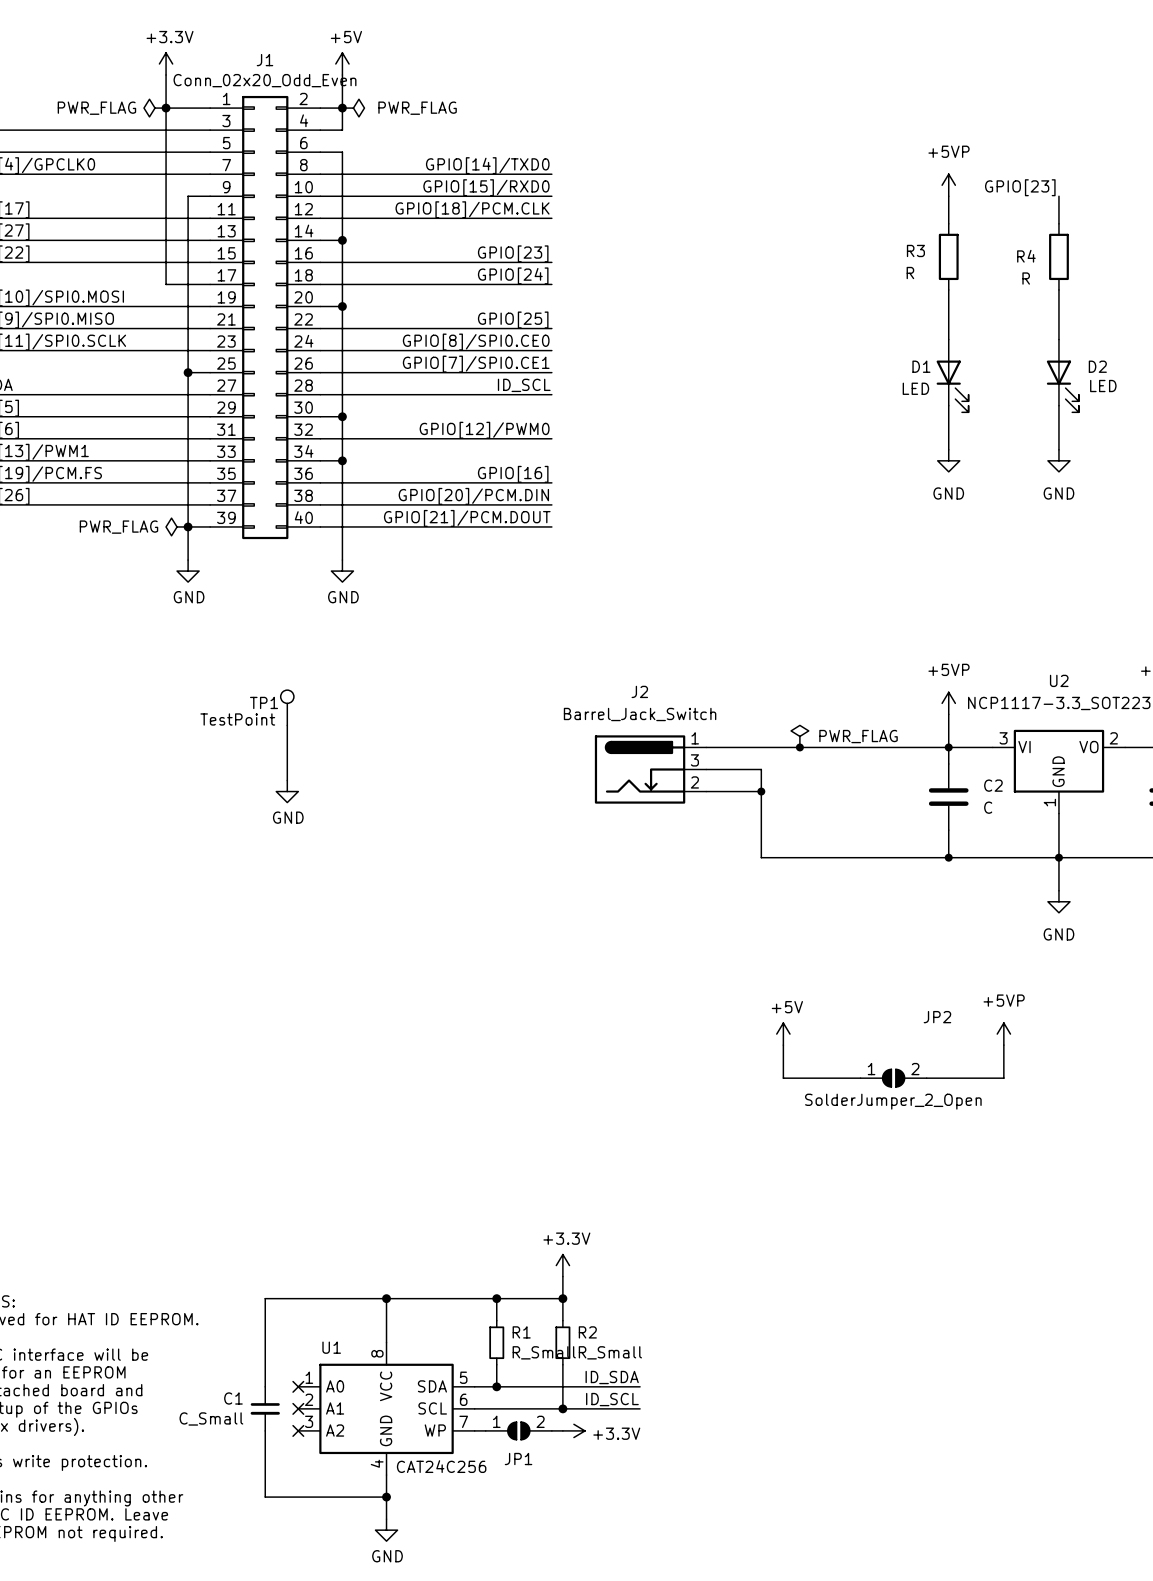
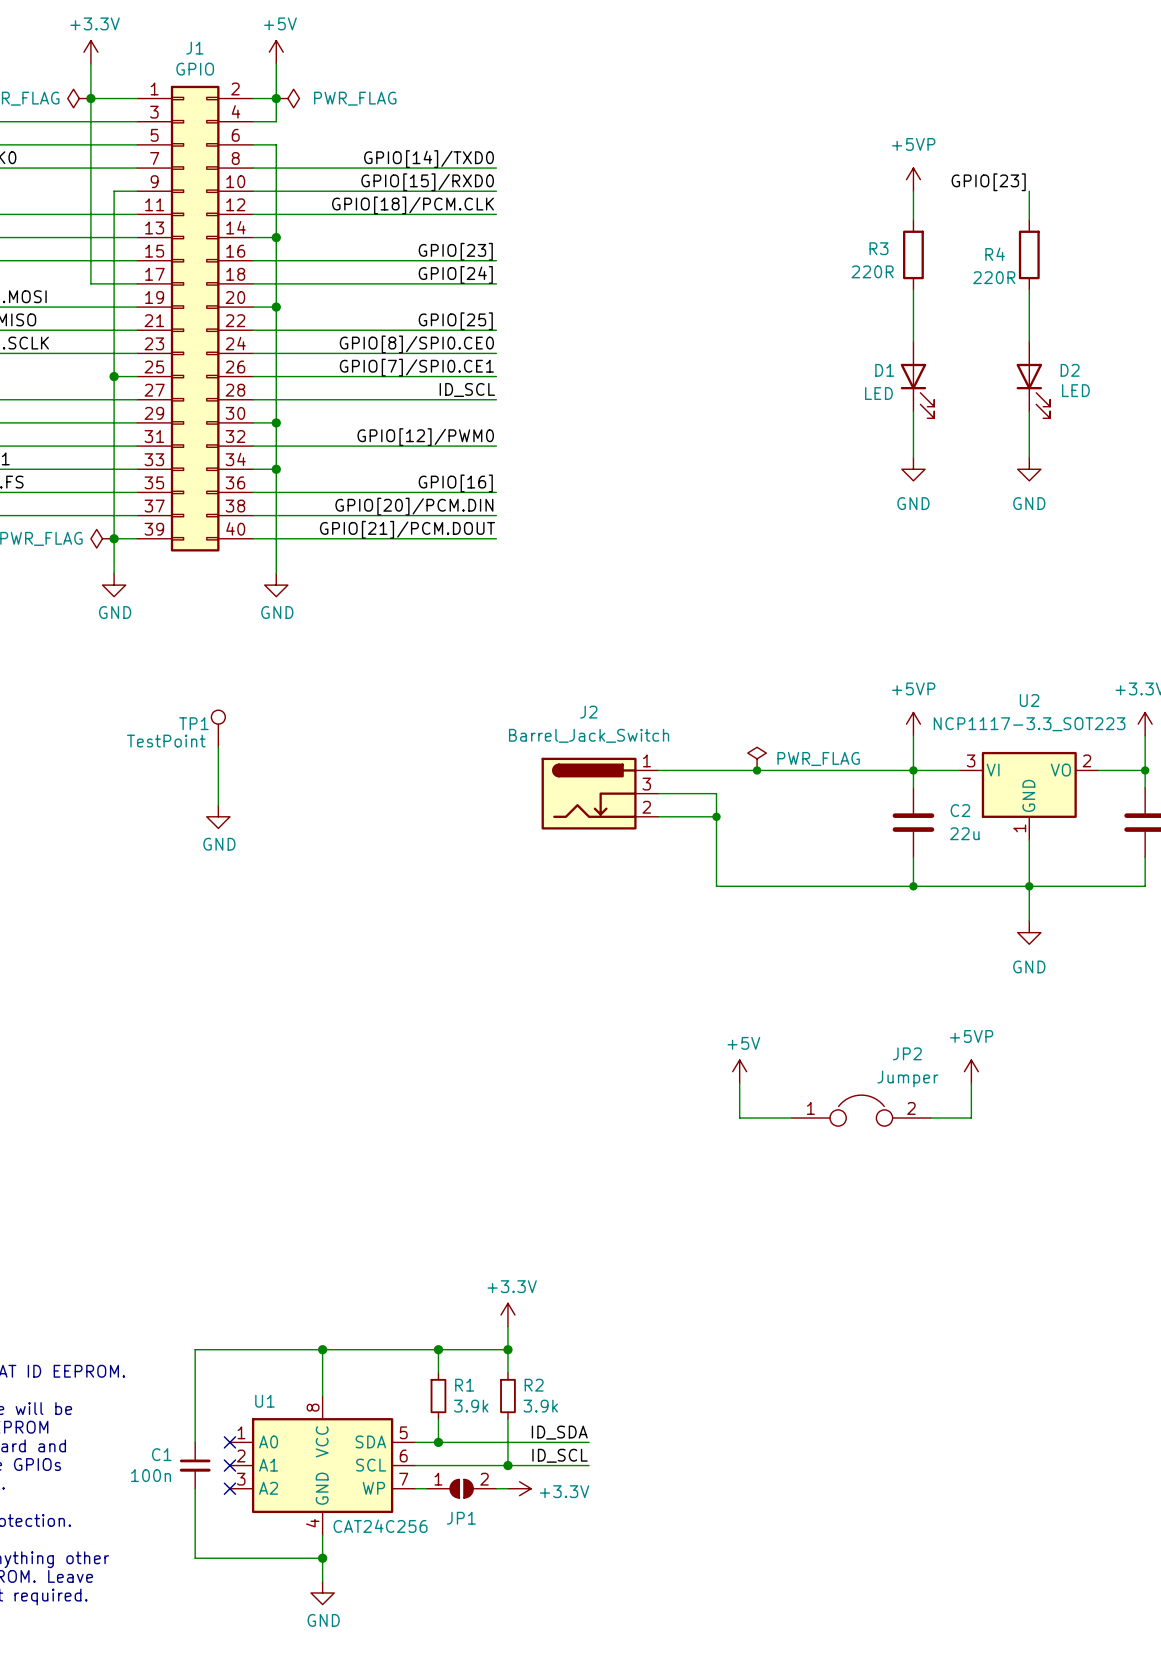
J1 value: Conn_02x20_Odd_Even (264, 80) -> GPIO (195, 69)
R3 value: R (910, 273) -> 220R (872, 271)
R4 value: R (1026, 278) -> 220R (994, 277)
C2 value: C (988, 807) -> 22u (964, 833)
JP2 symbol: [860, 1069, 927, 1087] -> [791, 1095, 931, 1127]
JP2 value: SolderJumper_2_Open (893, 1101) -> Jumper (907, 1078)
R1 value: R_Small (544, 1352) -> 3.9k (471, 1406)
R2 value: R_Small (610, 1352) -> 3.9k (540, 1406)
C1 value: C_Small (211, 1418) -> 100n (151, 1475)

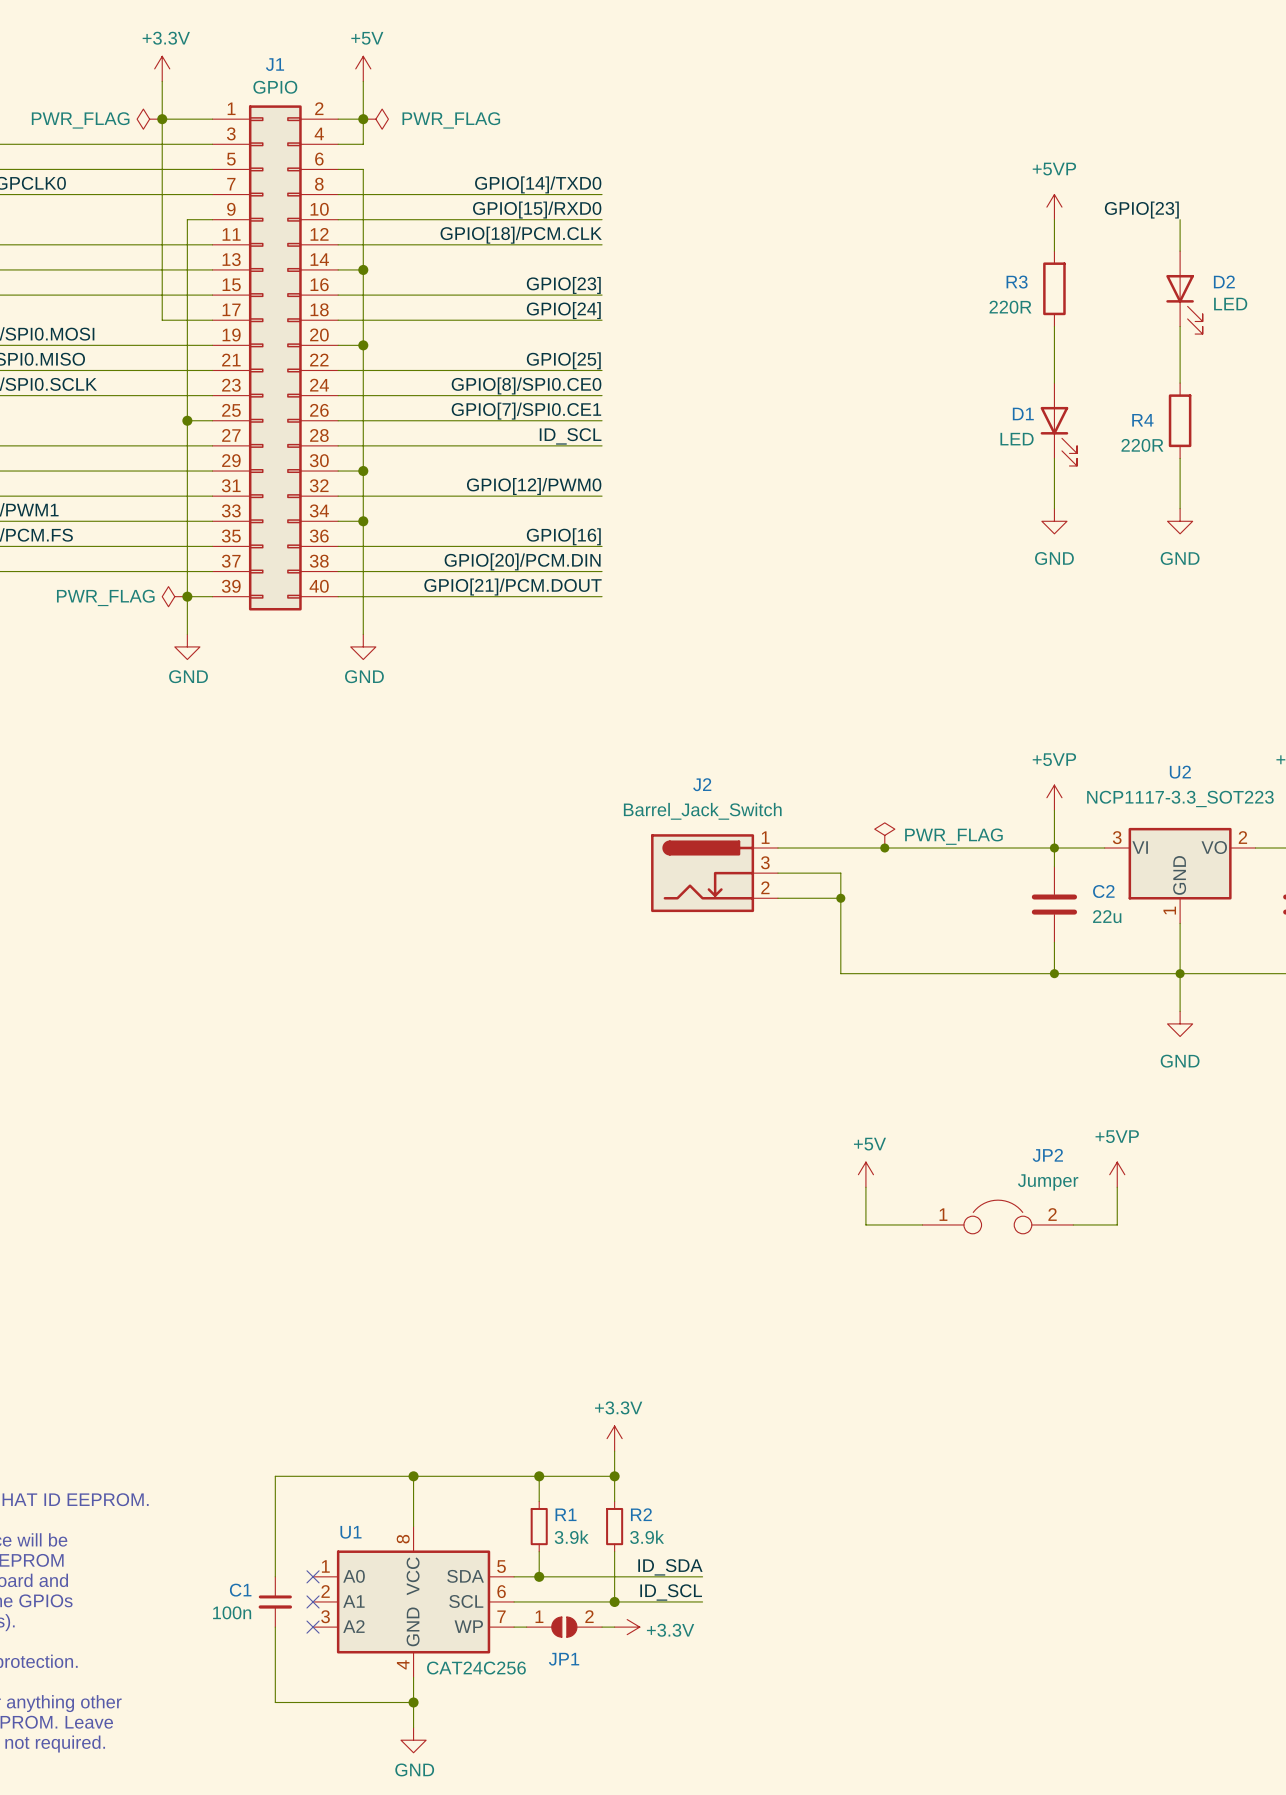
R4 position: (1029, 254) -> (1180, 420)
D2 position: (1033, 380) -> (1184, 292)
TP1: TestPoint (218, 728) -> none
wire: (218, 747) (218, 805) -> none
power symbol: GND (218, 816) -> none

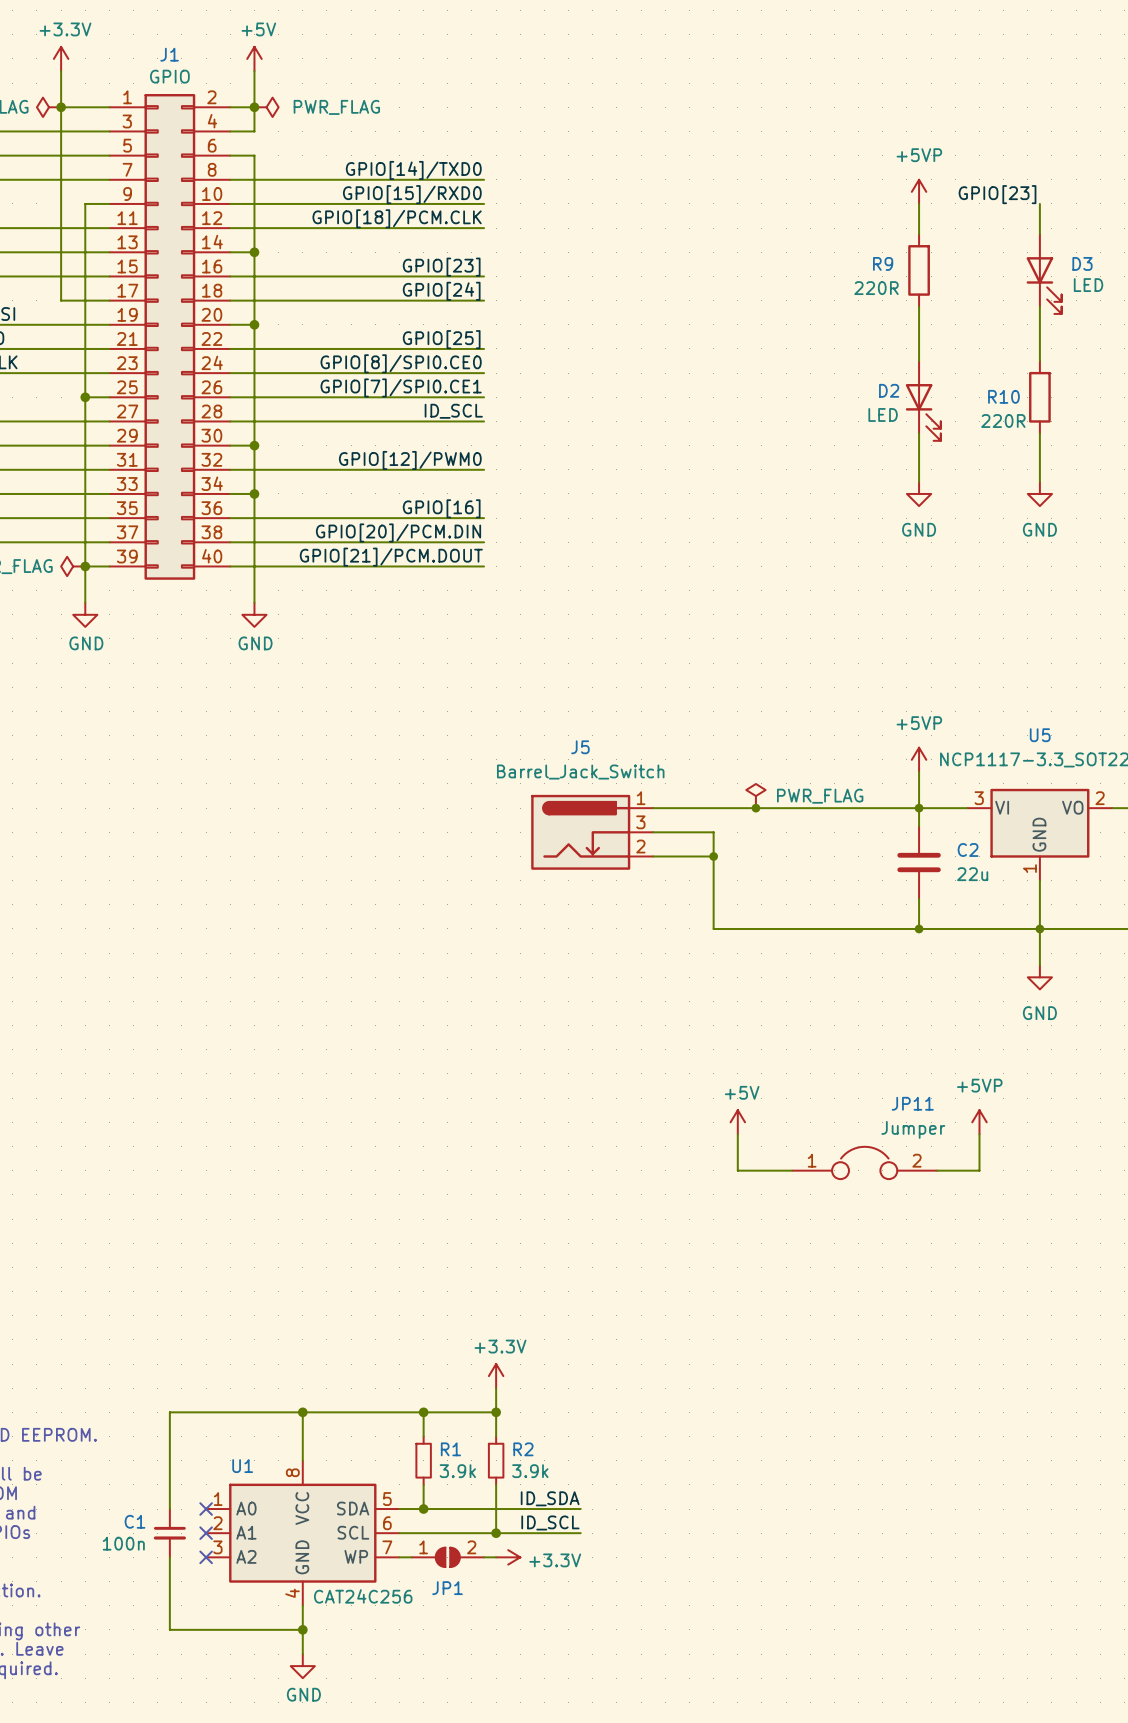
D2 name: D2 (1224, 281) -> D3 (1082, 263)
R3 name: R3 (1017, 282) -> R9 (883, 263)
D1 name: D1 (1023, 414) -> D2 (889, 390)
R4 name: R4 (1142, 420) -> R10 (1003, 396)
U2 name: U2 (1180, 772) -> U5 (1040, 735)
J2 name: J2 (702, 784) -> J5 (580, 747)
JP2 name: JP2 (1047, 1155) -> JP11 (912, 1103)

